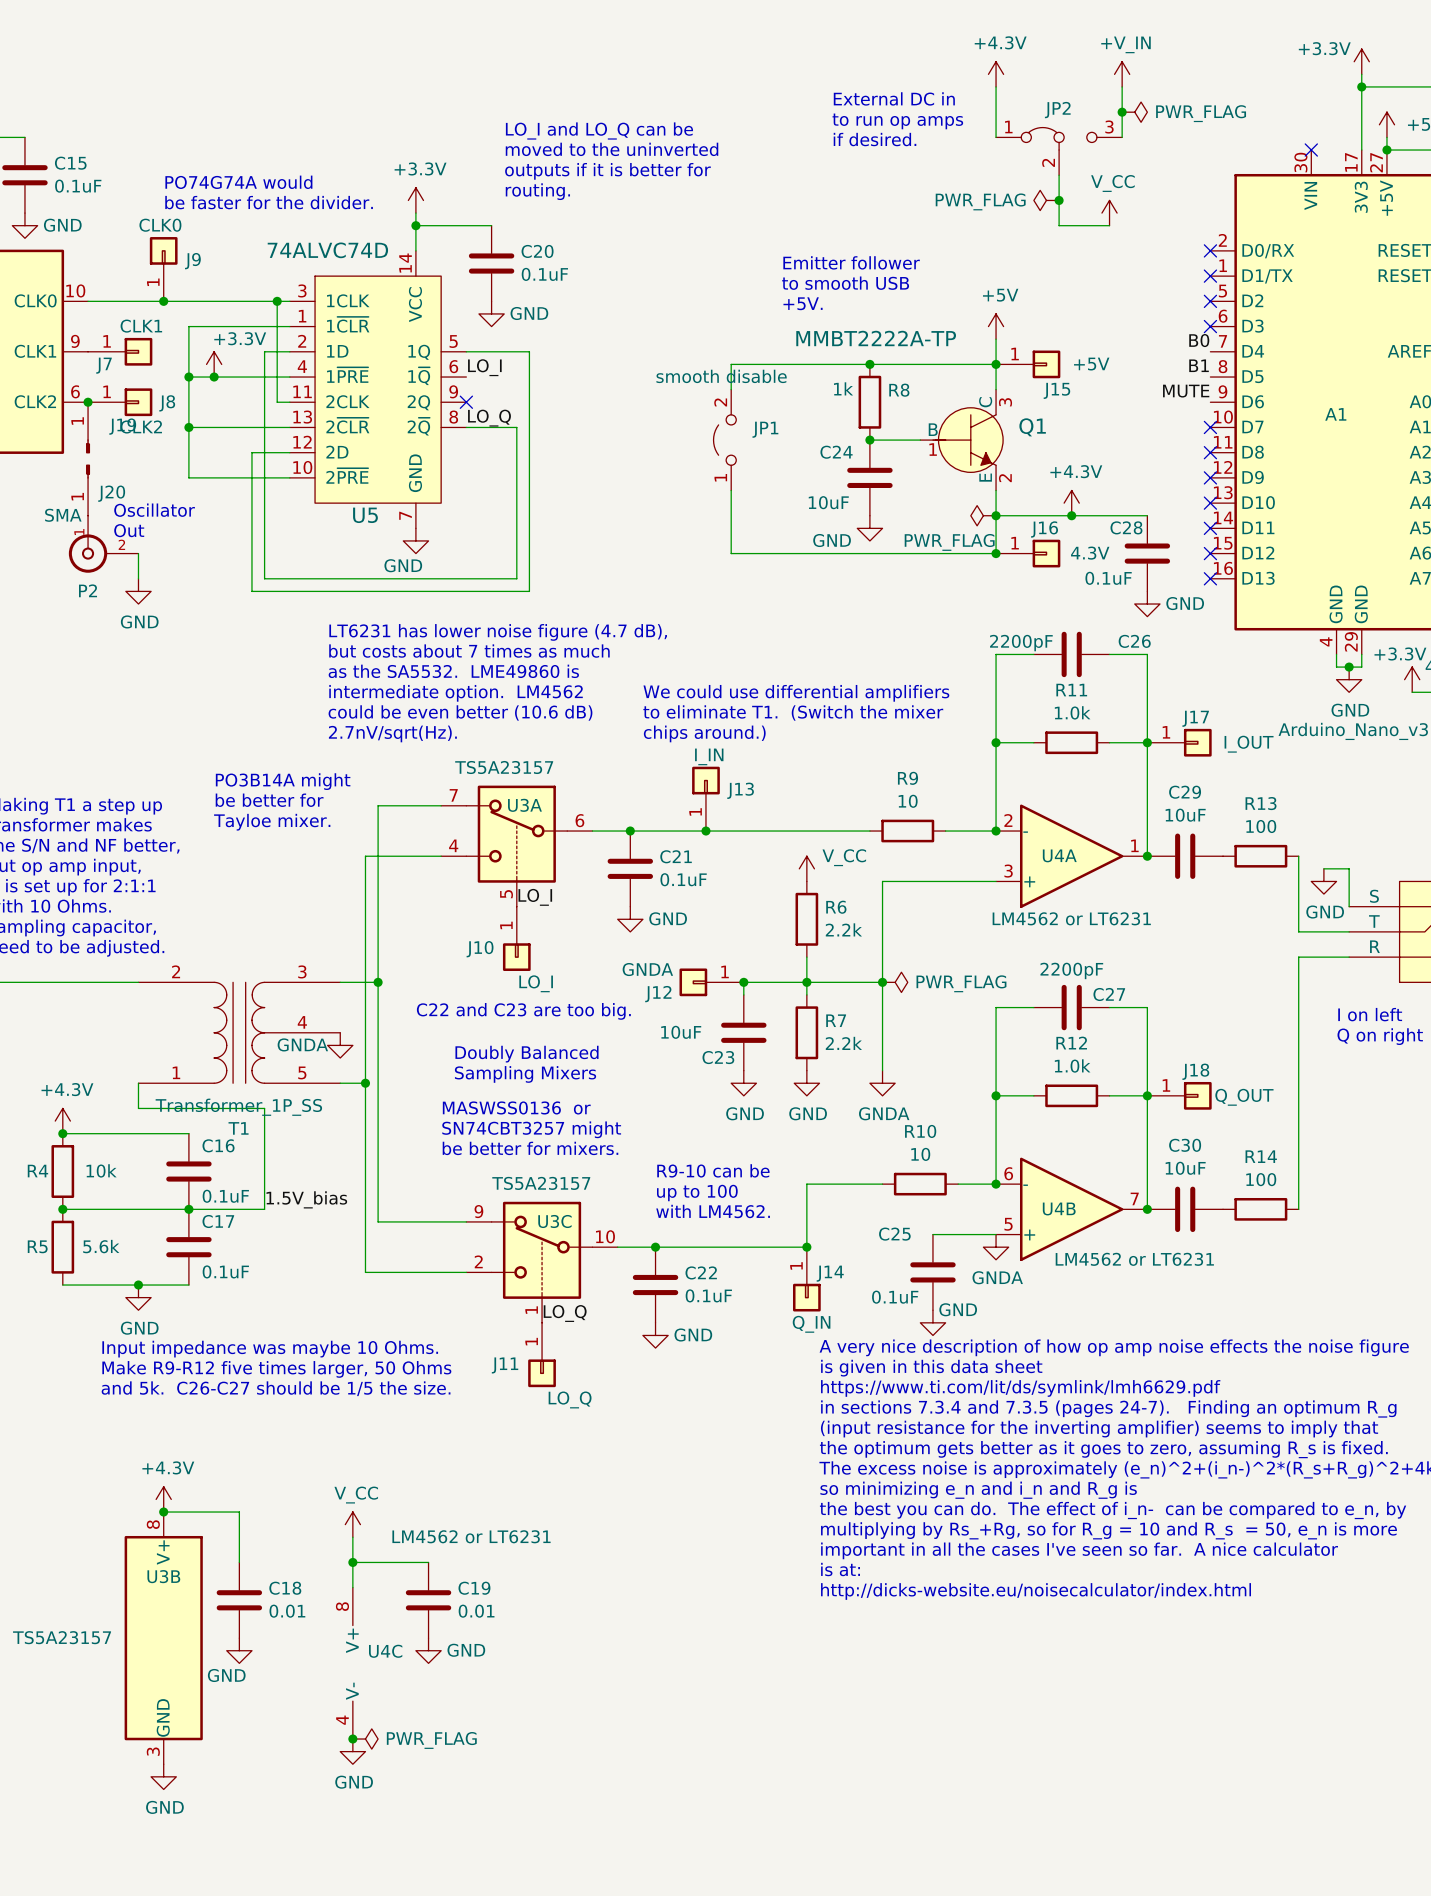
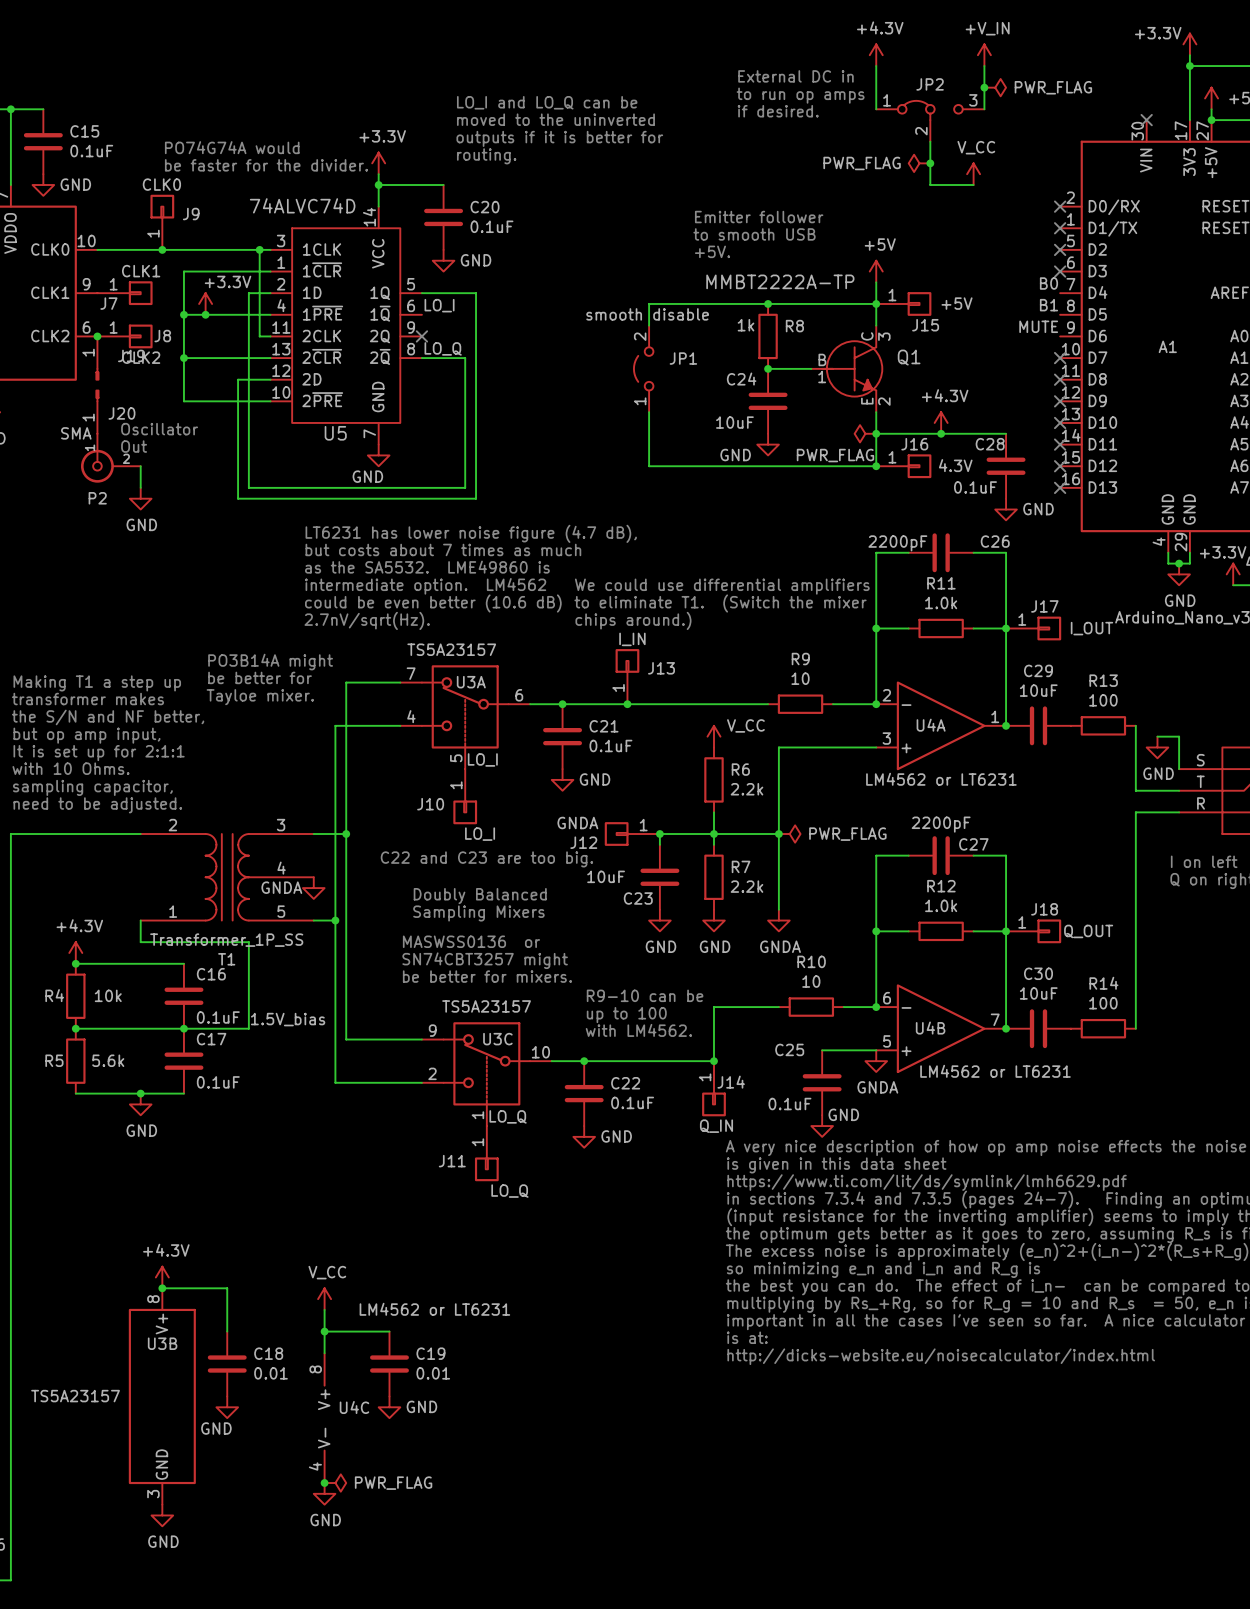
text: Input impedance was maybe 10 Ohms. (270, 1349) -> none
text: Make R9-R12 five times larger, 50 Ohms (276, 1369) -> none
text: and 5k. C26-C27 should be 1/5 the size. (276, 1388) -> none

